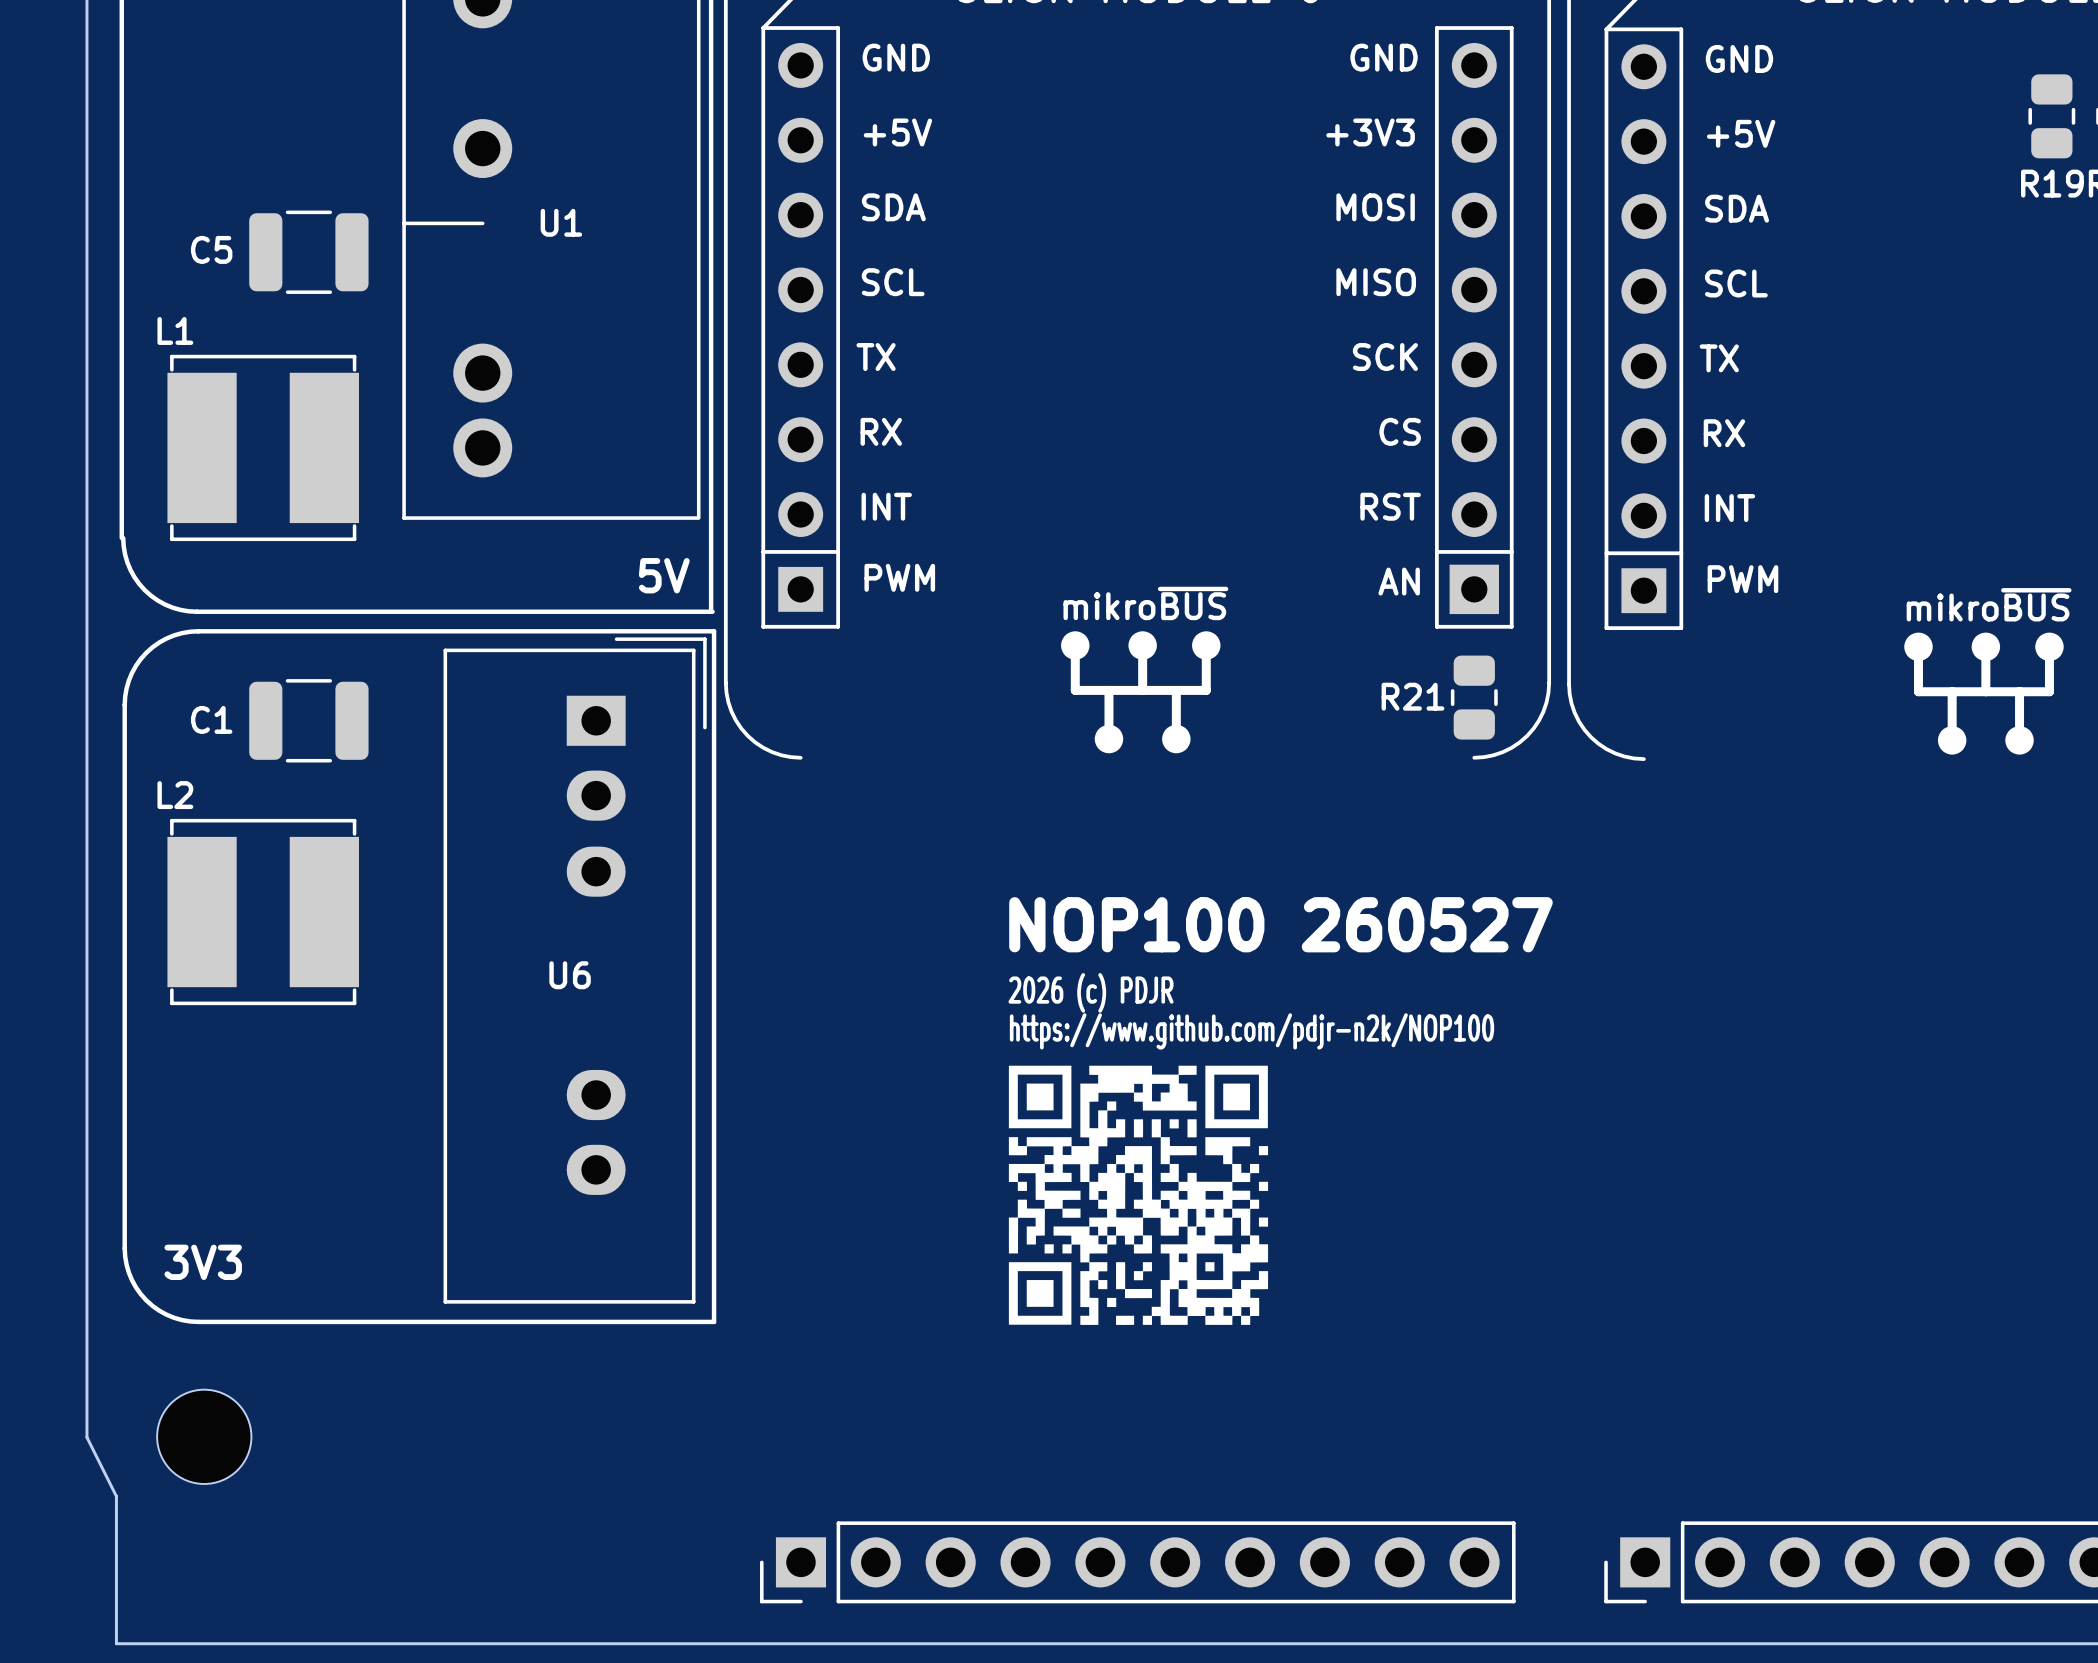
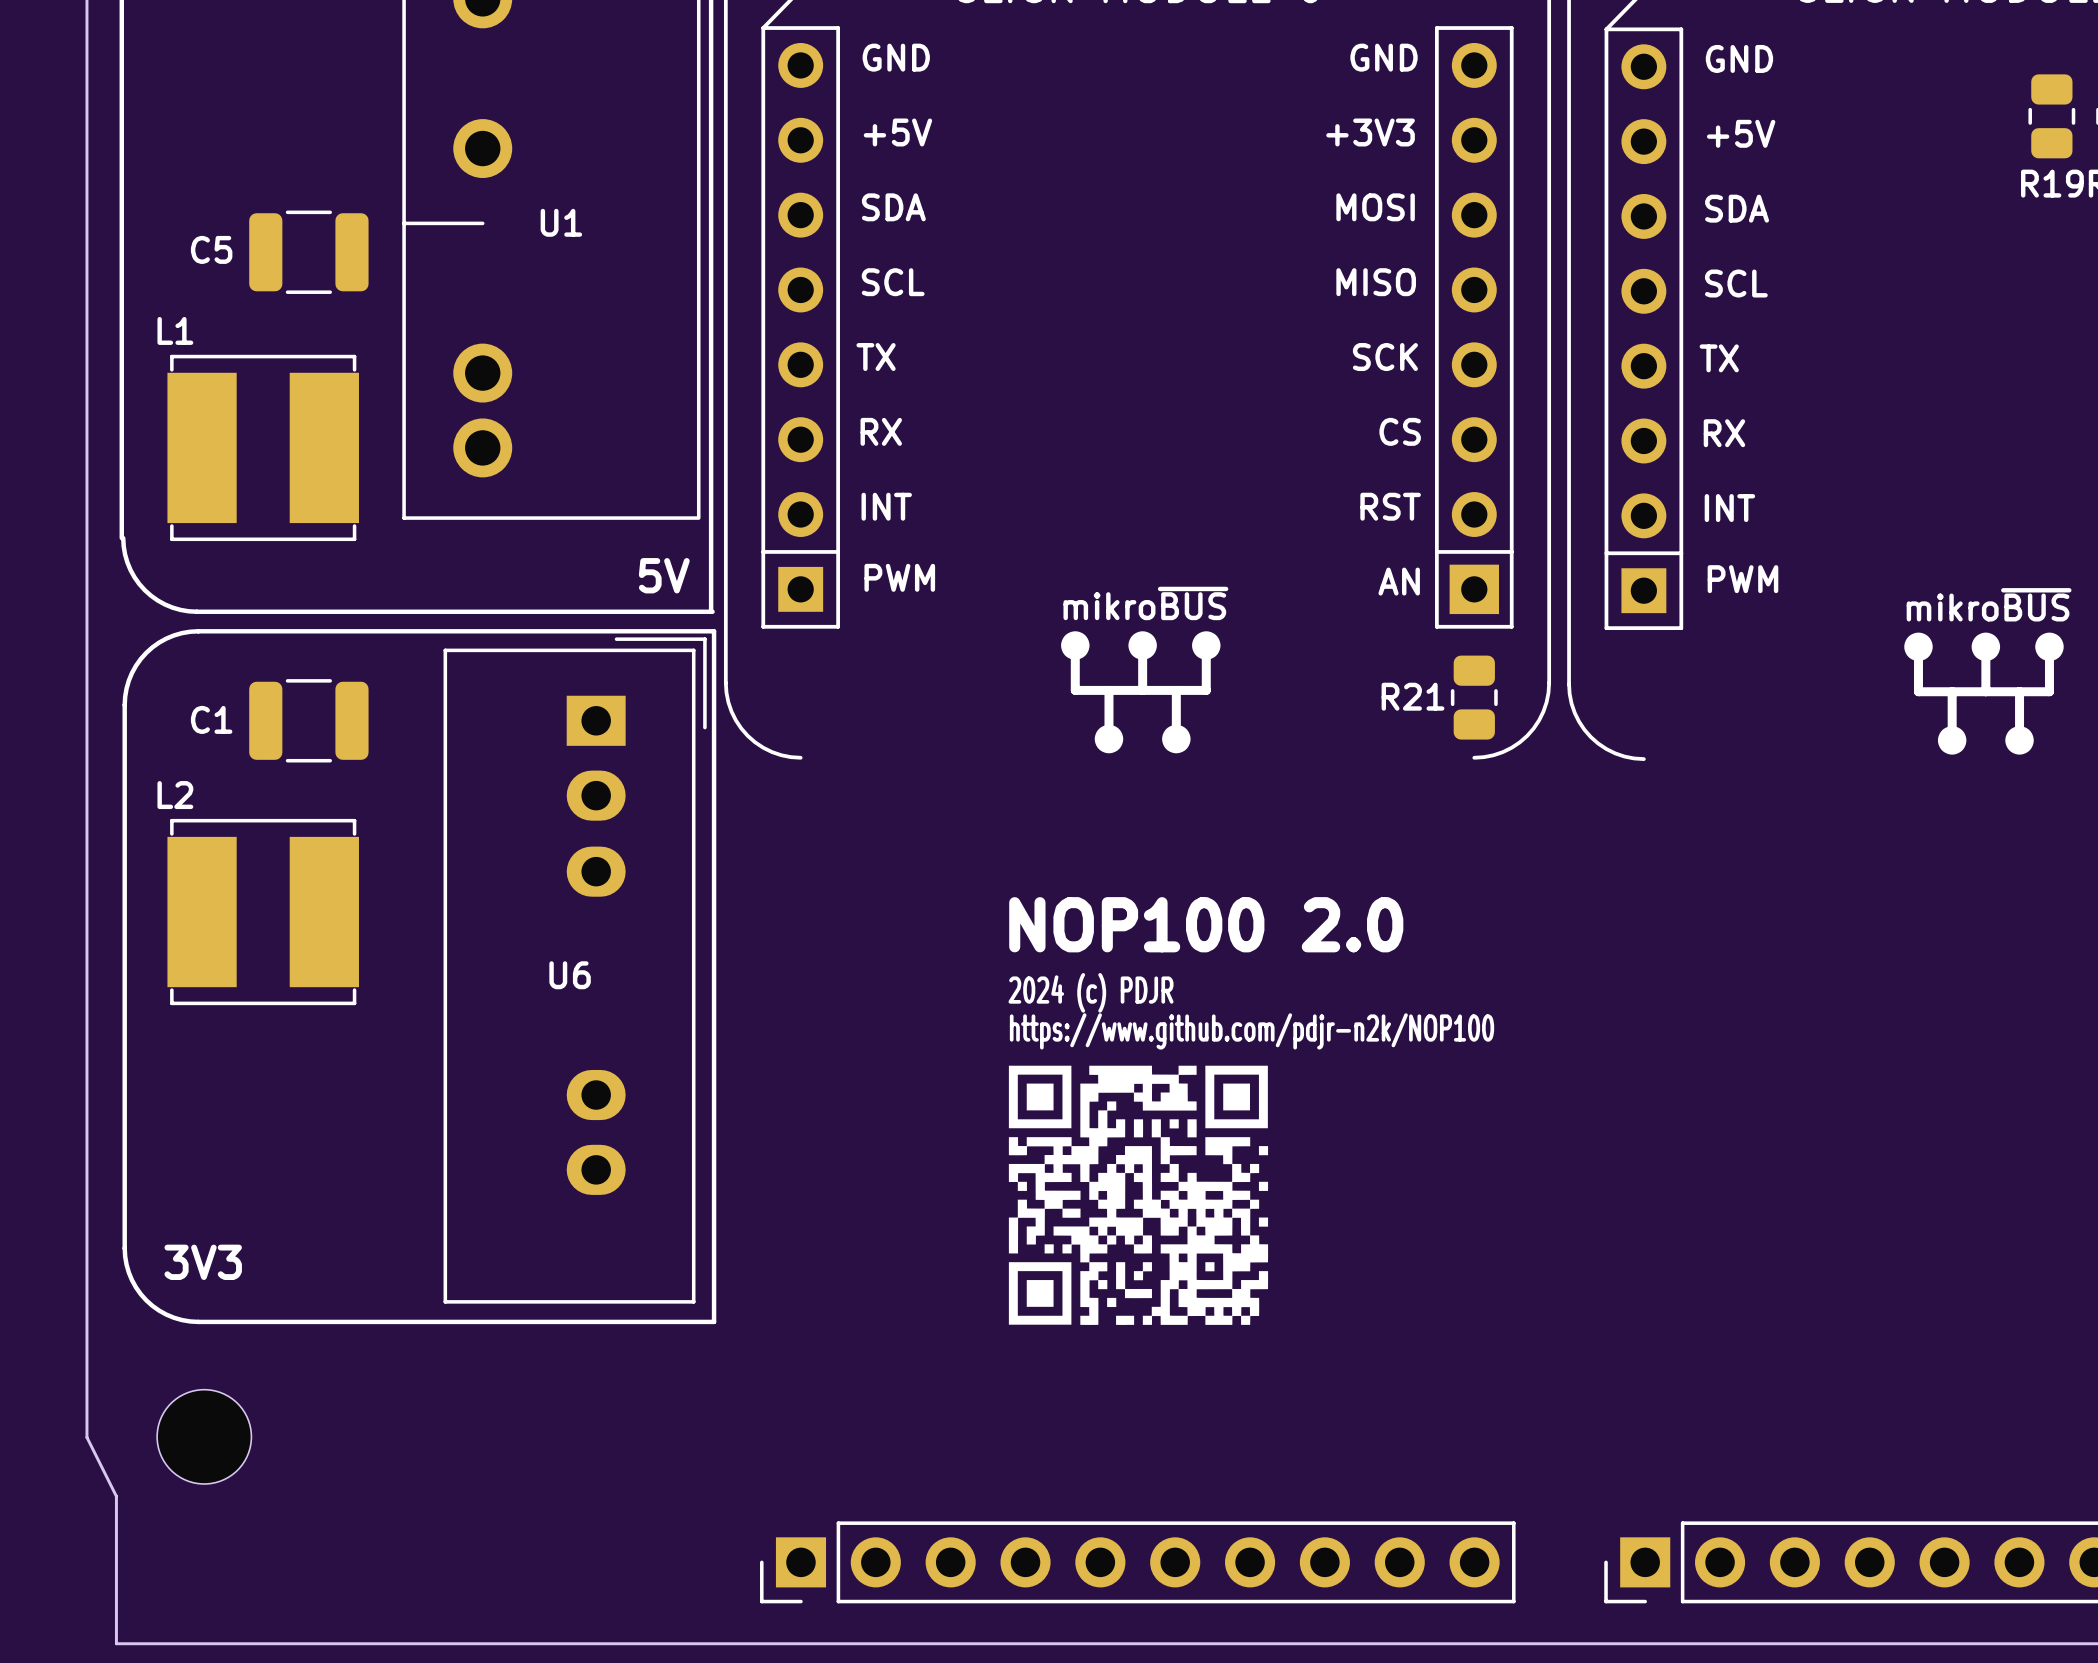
text: NOP100 260527 (1280, 924) -> NOP100 2.0 (1206, 924)
text: 2026 (c) PDJR (1090, 992) -> 2024 (c) PDJR (1090, 992)

